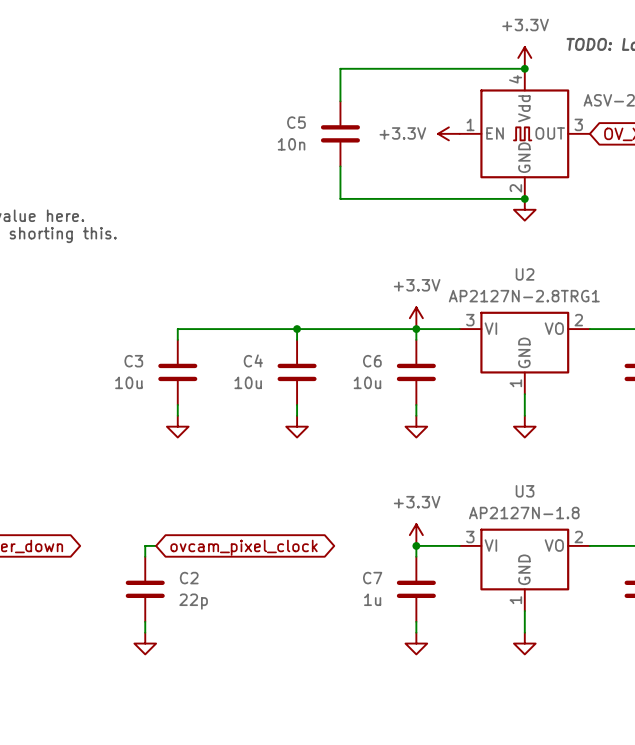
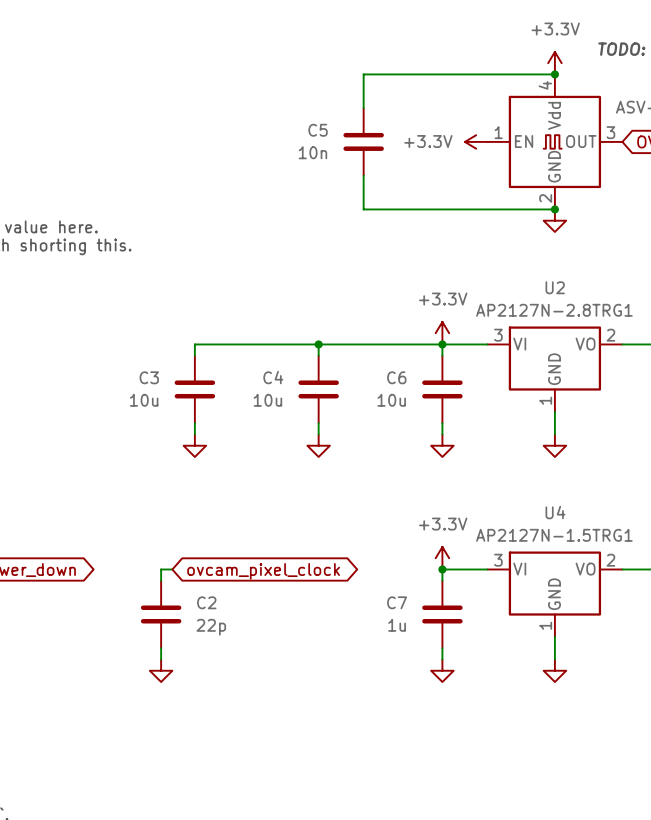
U3 name: U3 (525, 491) -> U4 (555, 512)
U3 value: AP2127N-1.8 (524, 513) -> AP2127N-1.5TRG1 (554, 535)

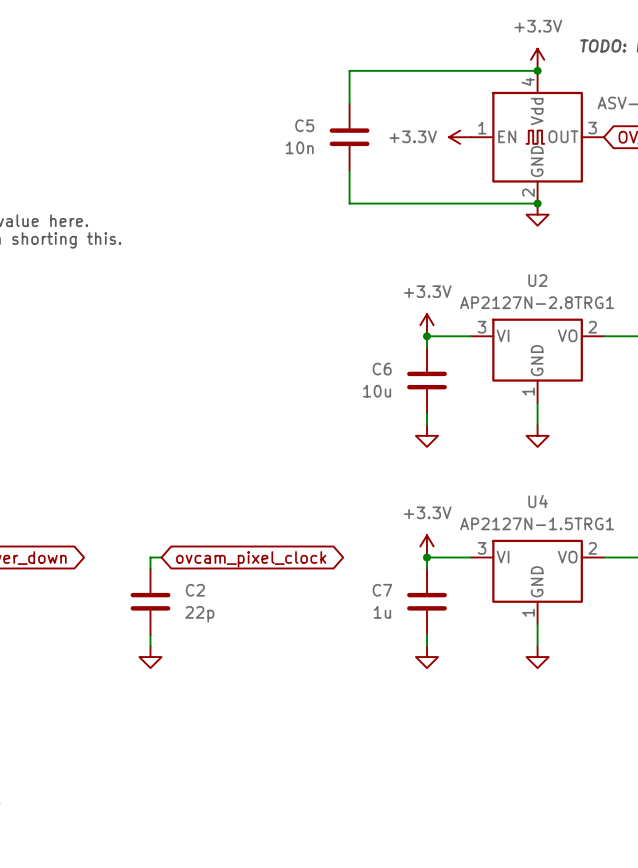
wire: (318, 344) (318, 355) -> none
junction: (318, 344) -> none
wire: (442, 344) (194, 344) (194, 355) -> none
C3: 10u (194, 389) -> none
C4: 10u (318, 389) -> none
wire: (194, 423) (194, 434) -> none
wire: (318, 423) (318, 434) -> none
power symbol: (194, 445) -> none
power symbol: (318, 445) -> none

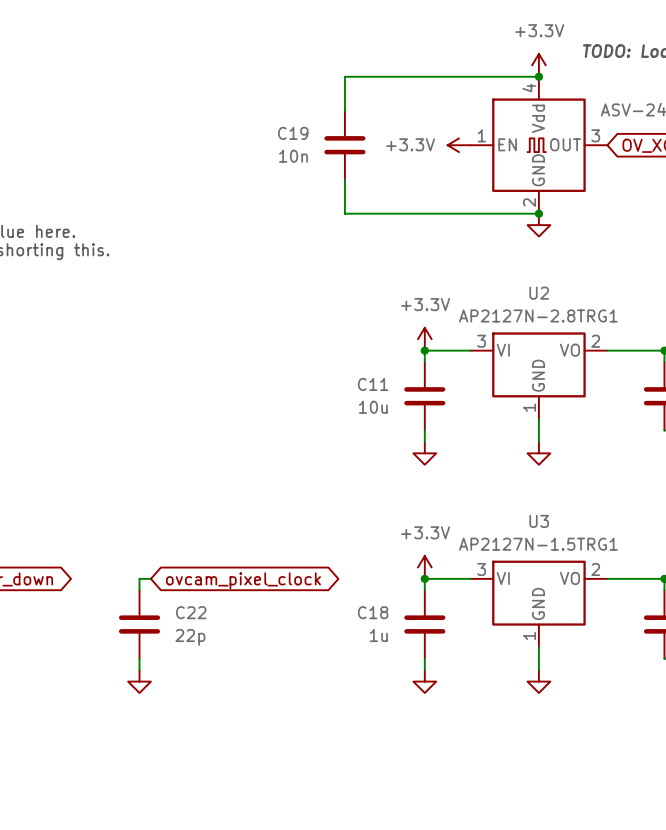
C5 name: C5 (304, 125) -> C19 (293, 133)
C6 name: C6 (382, 369) -> C11 (373, 384)
U4 name: U4 (538, 501) -> U3 (539, 521)
C2 name: C2 (195, 590) -> C22 (191, 612)
C7 name: C7 (382, 590) -> C18 (373, 612)

